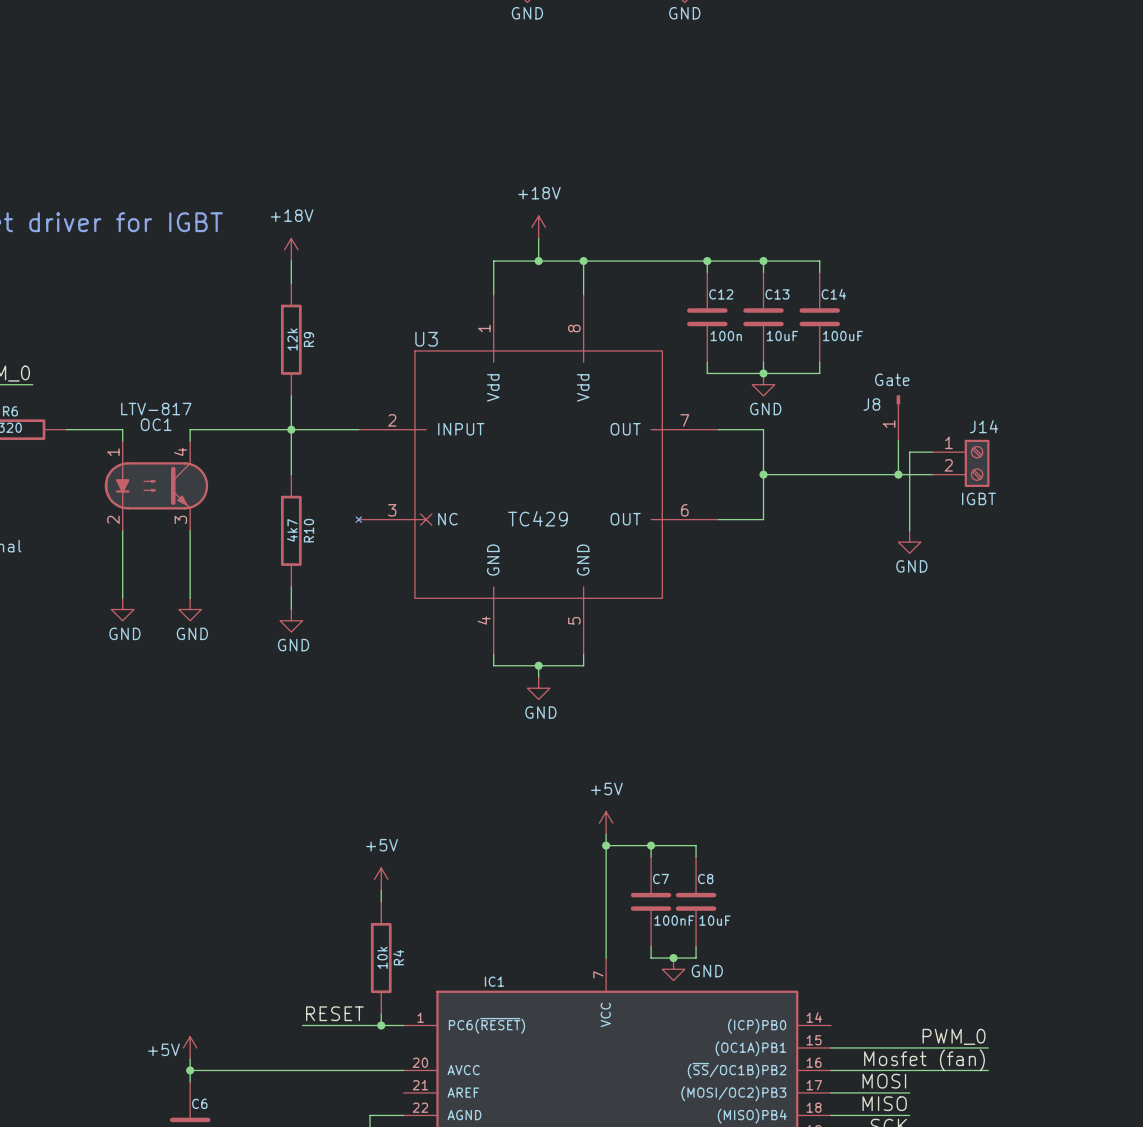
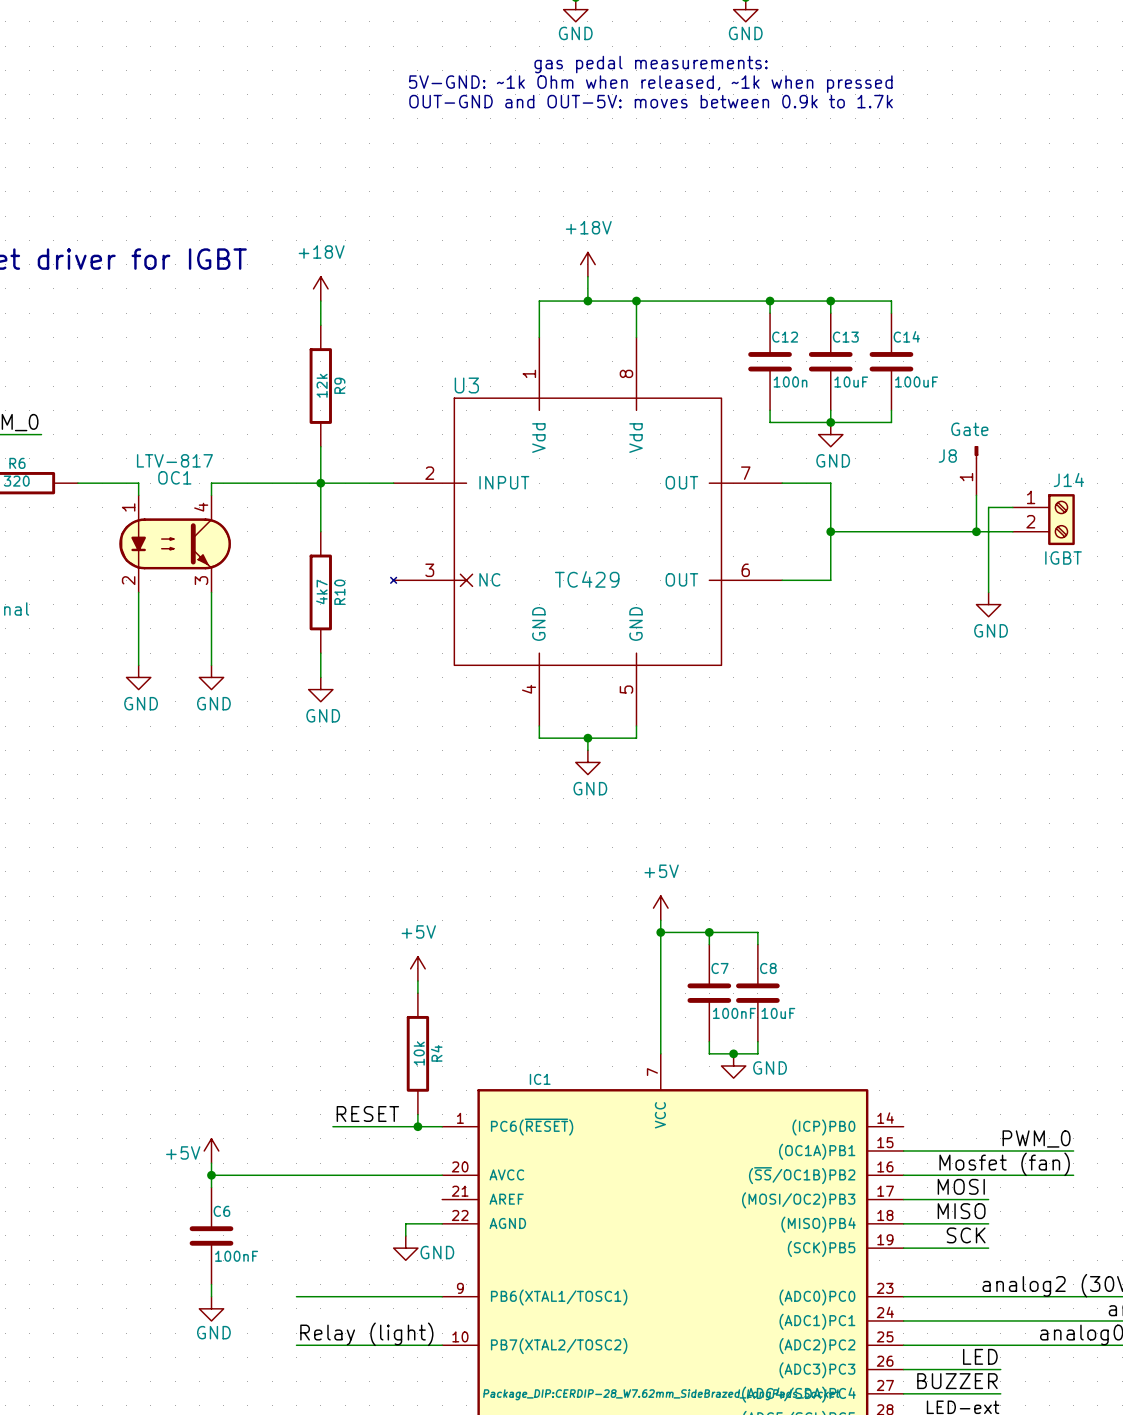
text: none -> gas pedal measurements: (651, 64)
text: none -> 5V-GND: ~1k Ohm when released, ~1k when pressed (650, 84)
text: none -> OUT-GND and OUT-5V: moves between 0.9k to 1.7k (651, 101)

